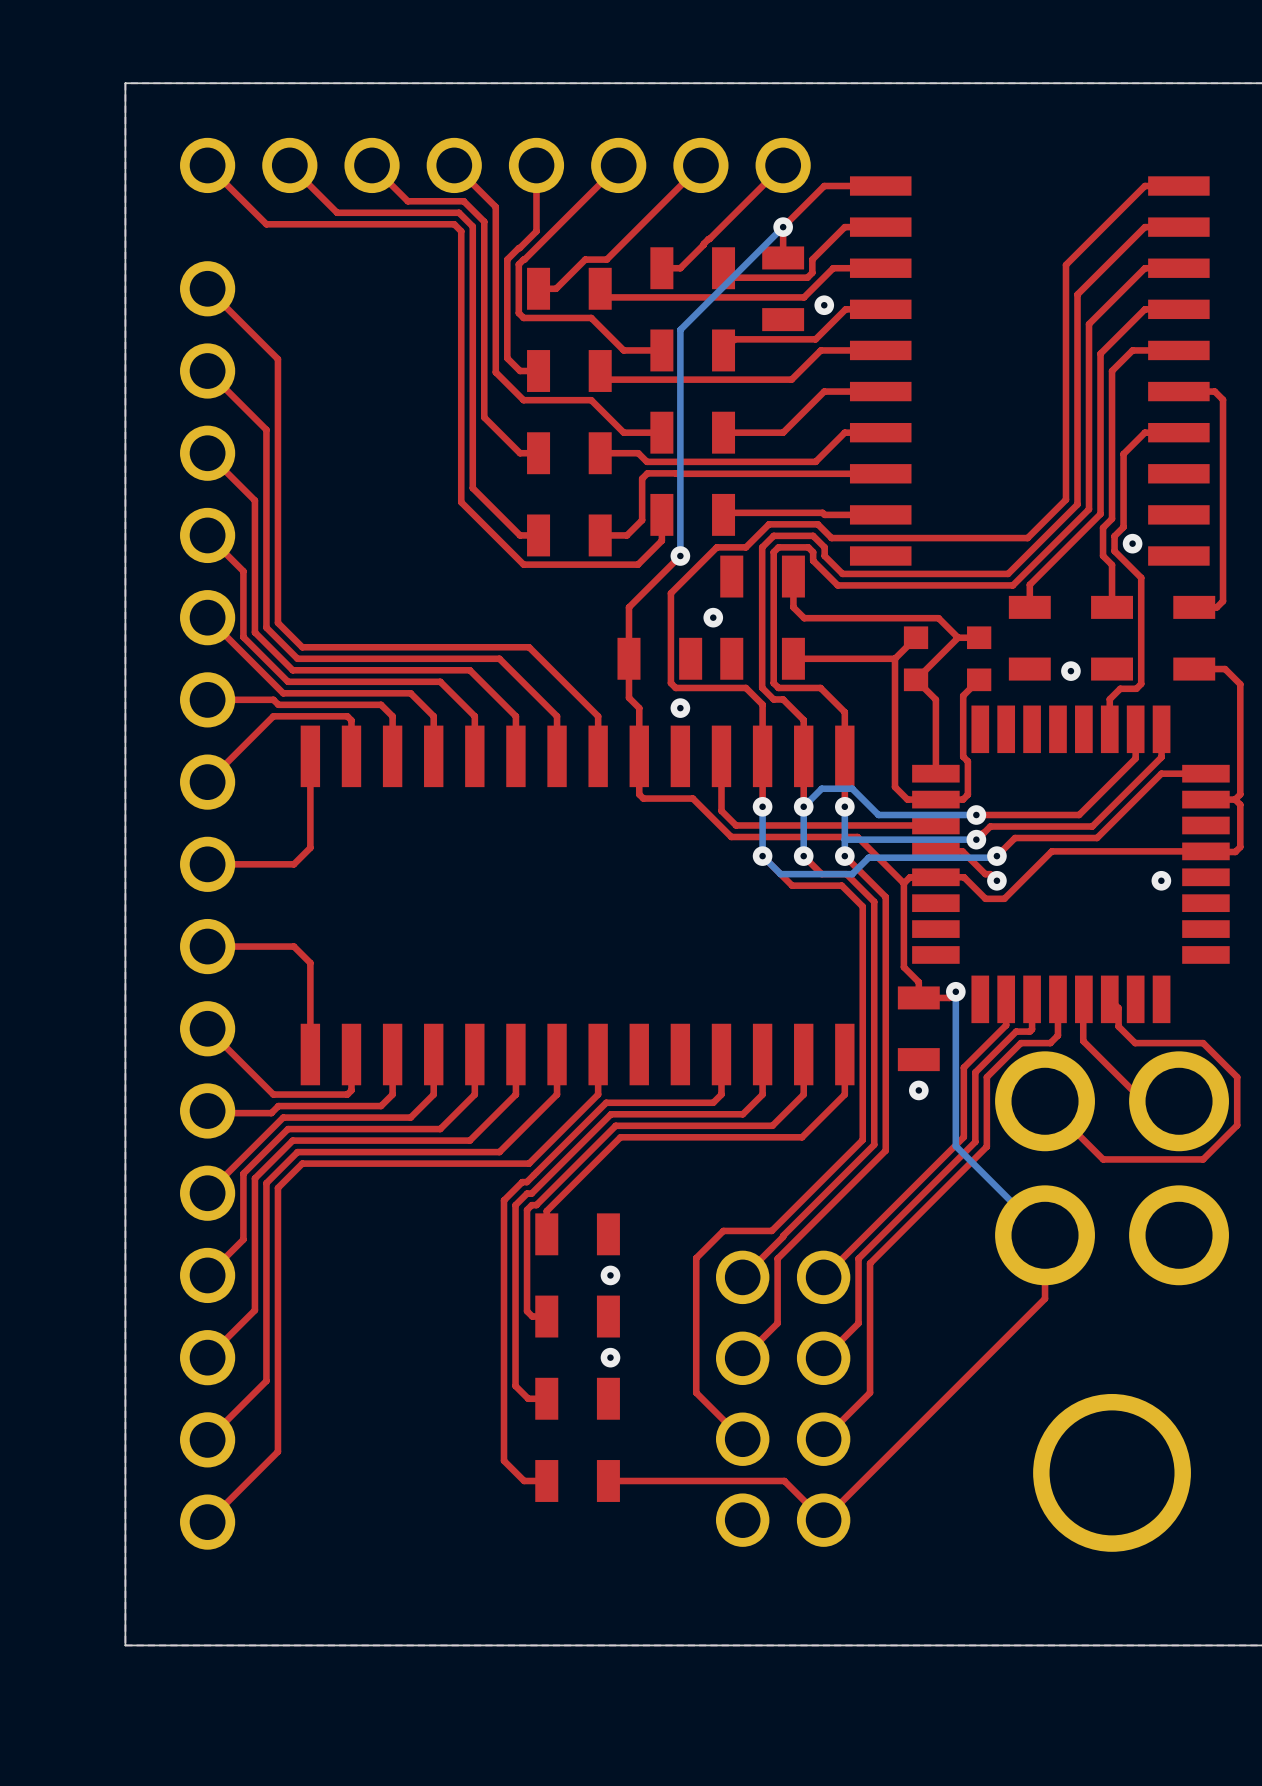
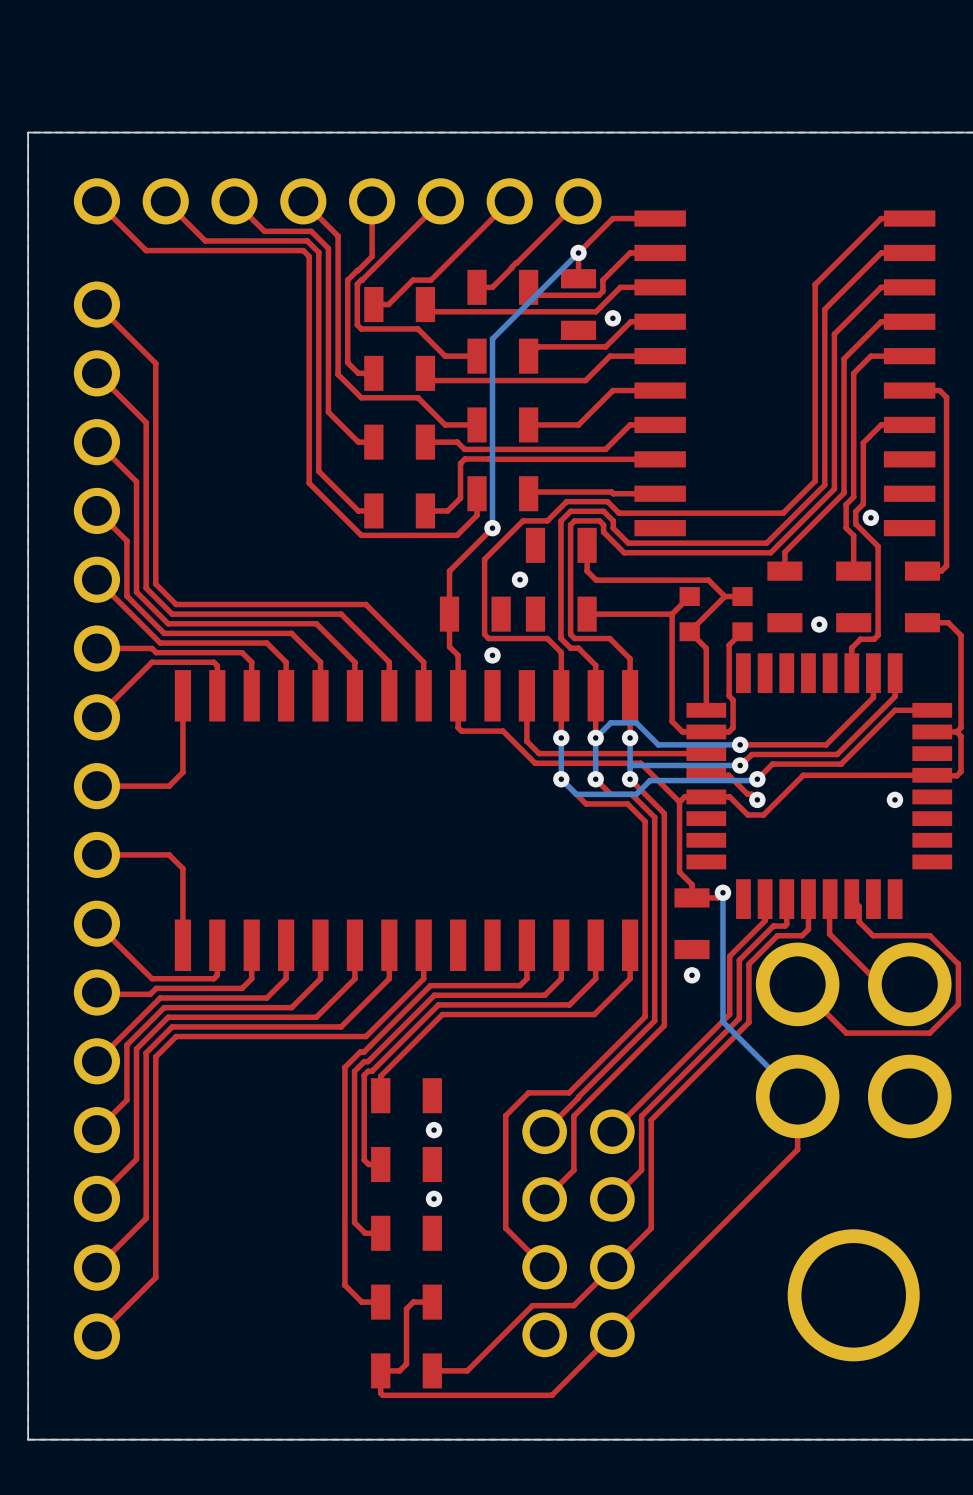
top track: none -> (612, 1267) (573, 1305) (532, 1305) (467, 1370) (432, 1370)
top track: (608, 1480) (784, 1480) (823, 1520) -> (432, 1302) (413, 1302) (406, 1308) (406, 1364) (399, 1370) (380, 1370) (380, 1393) (382, 1395) (551, 1395) (612, 1334)
part: none -> (406, 1370)

